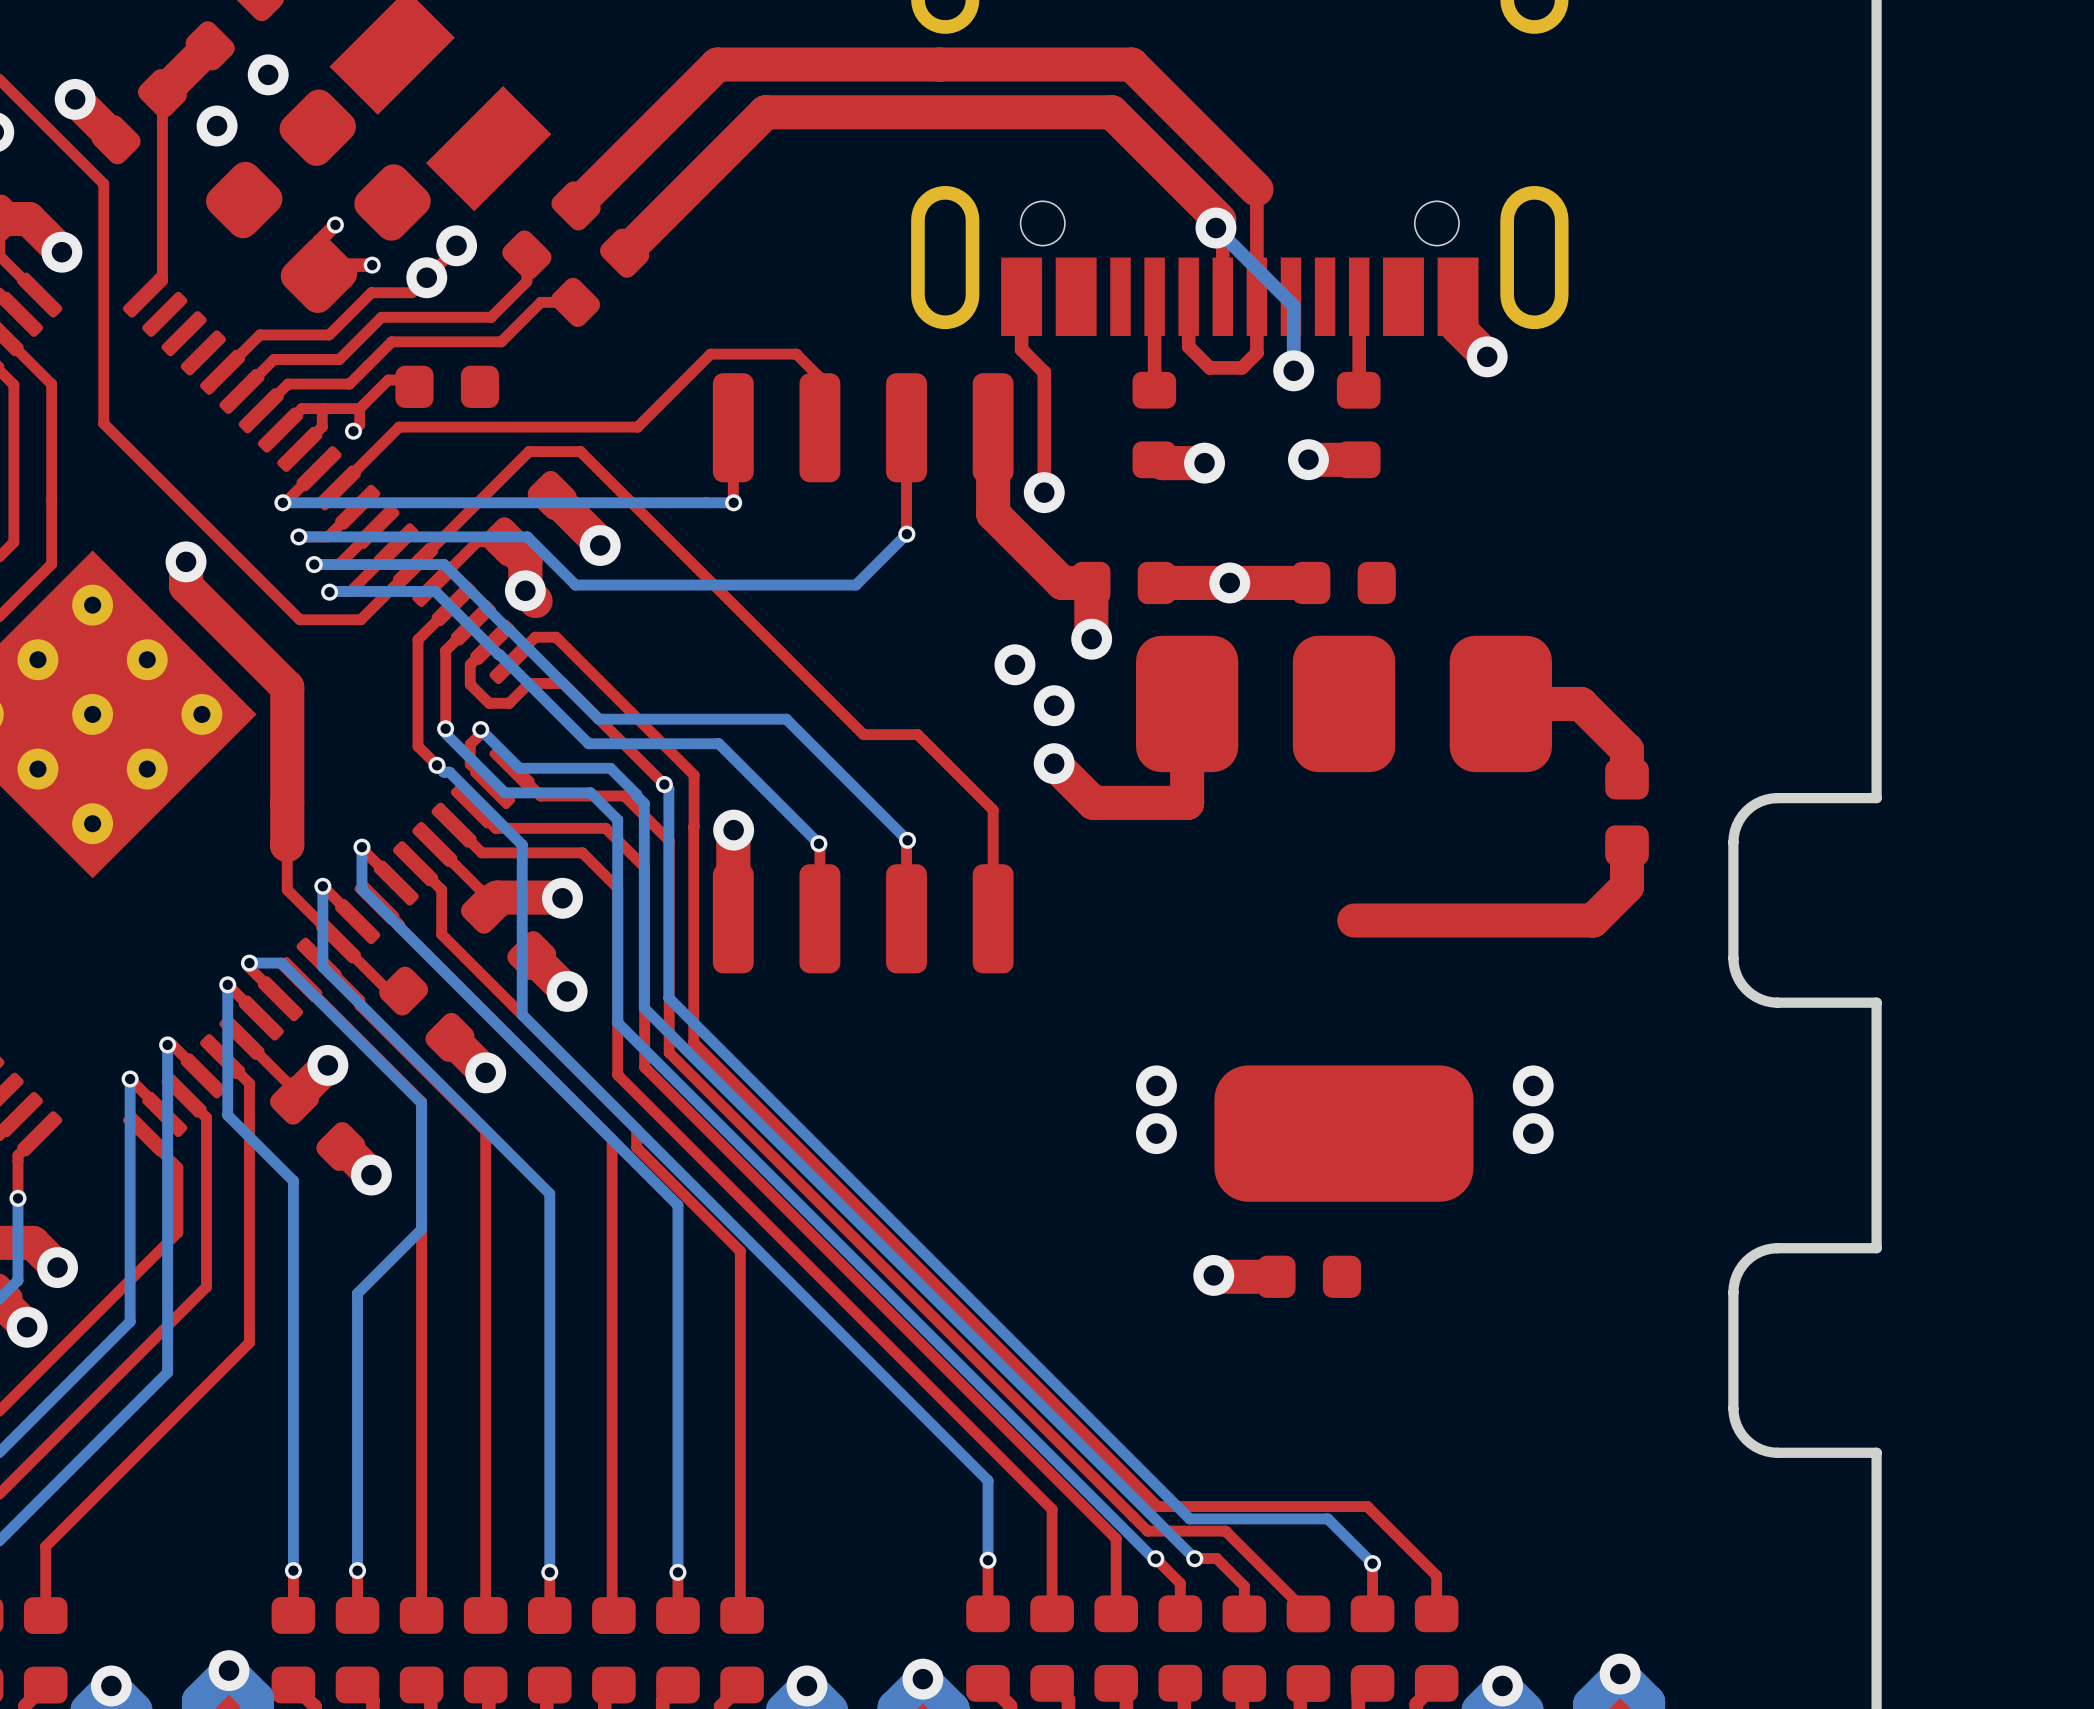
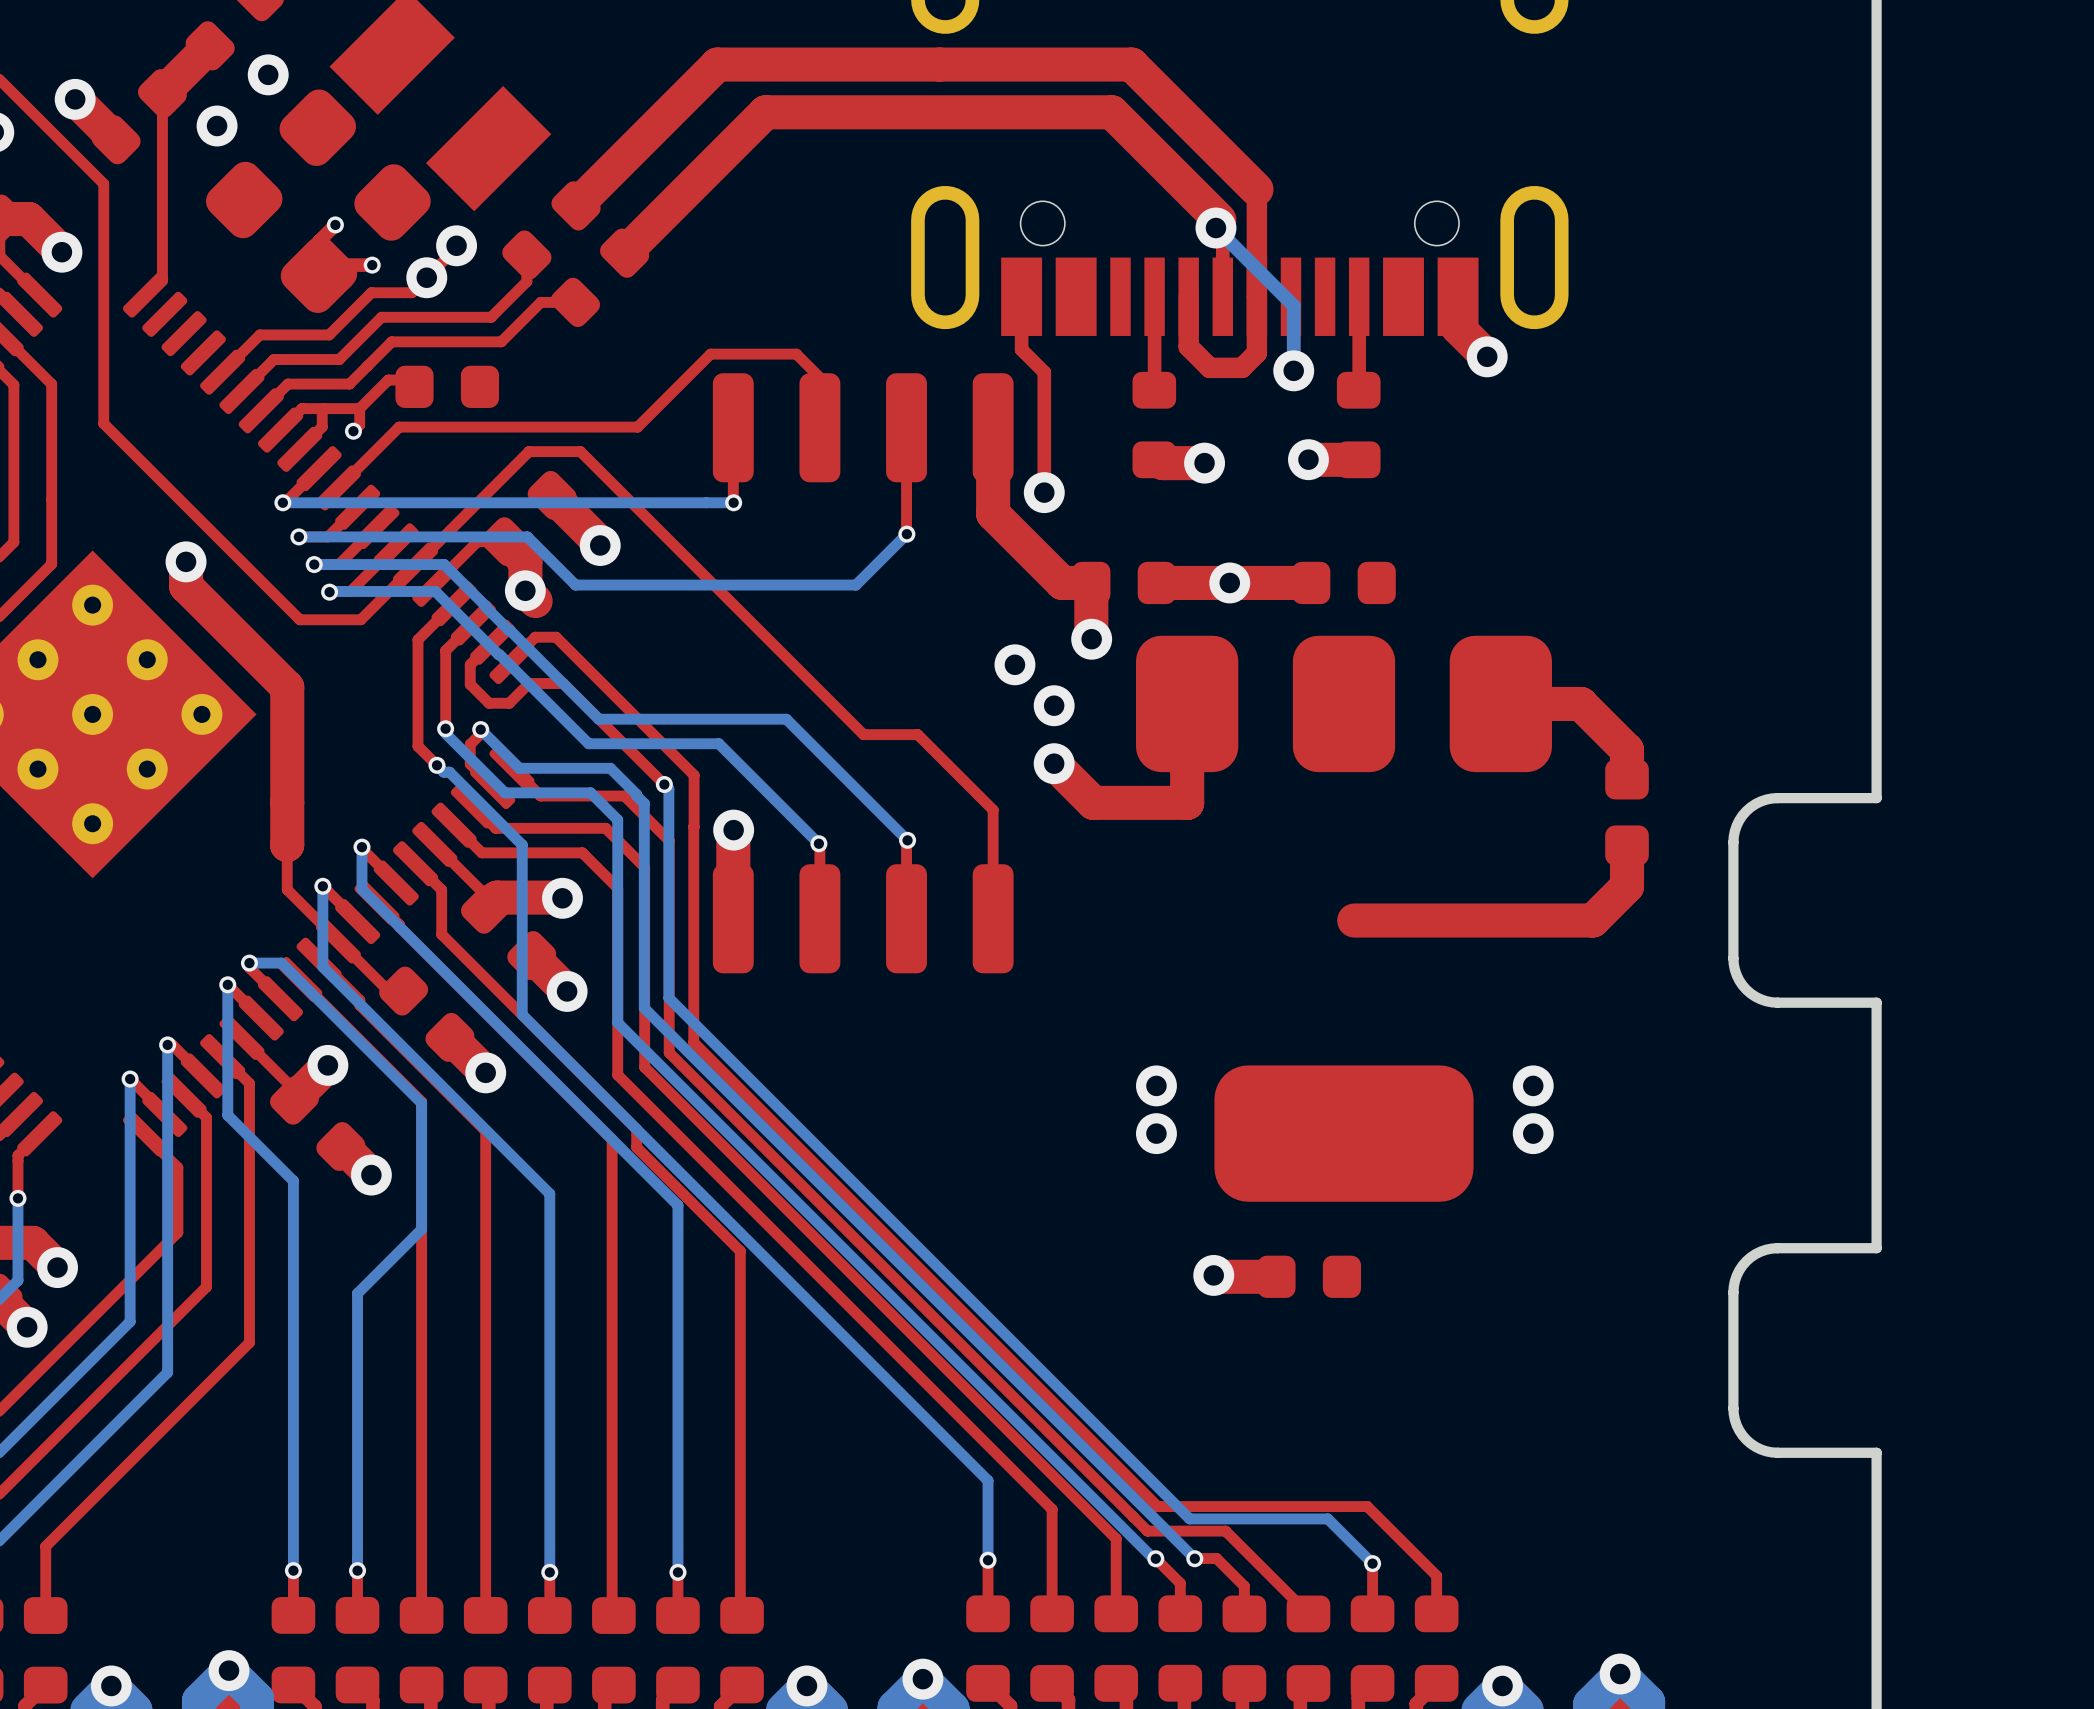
top track width: thin (1256, 189) (1256, 353) (1242, 367) (1209, 367) (1188, 346) (1188, 296) -> thick (1256, 189) (1256, 353) (1242, 367) (1209, 367) (1188, 346) (1188, 296)

